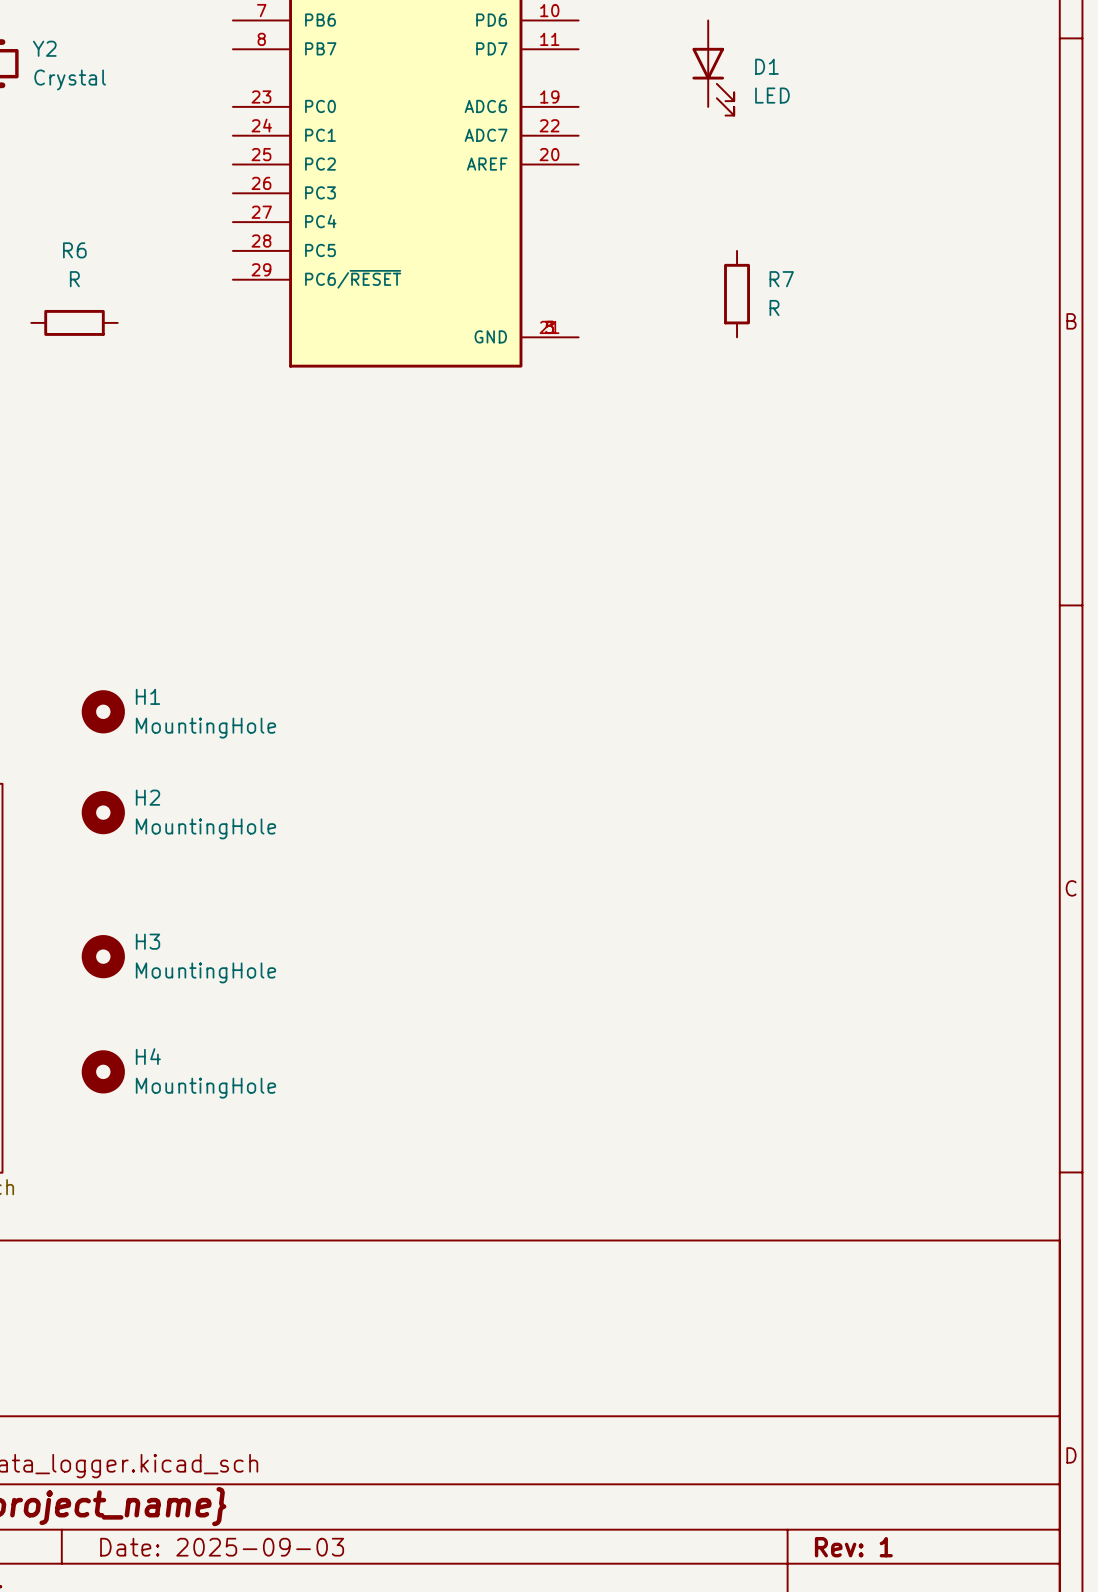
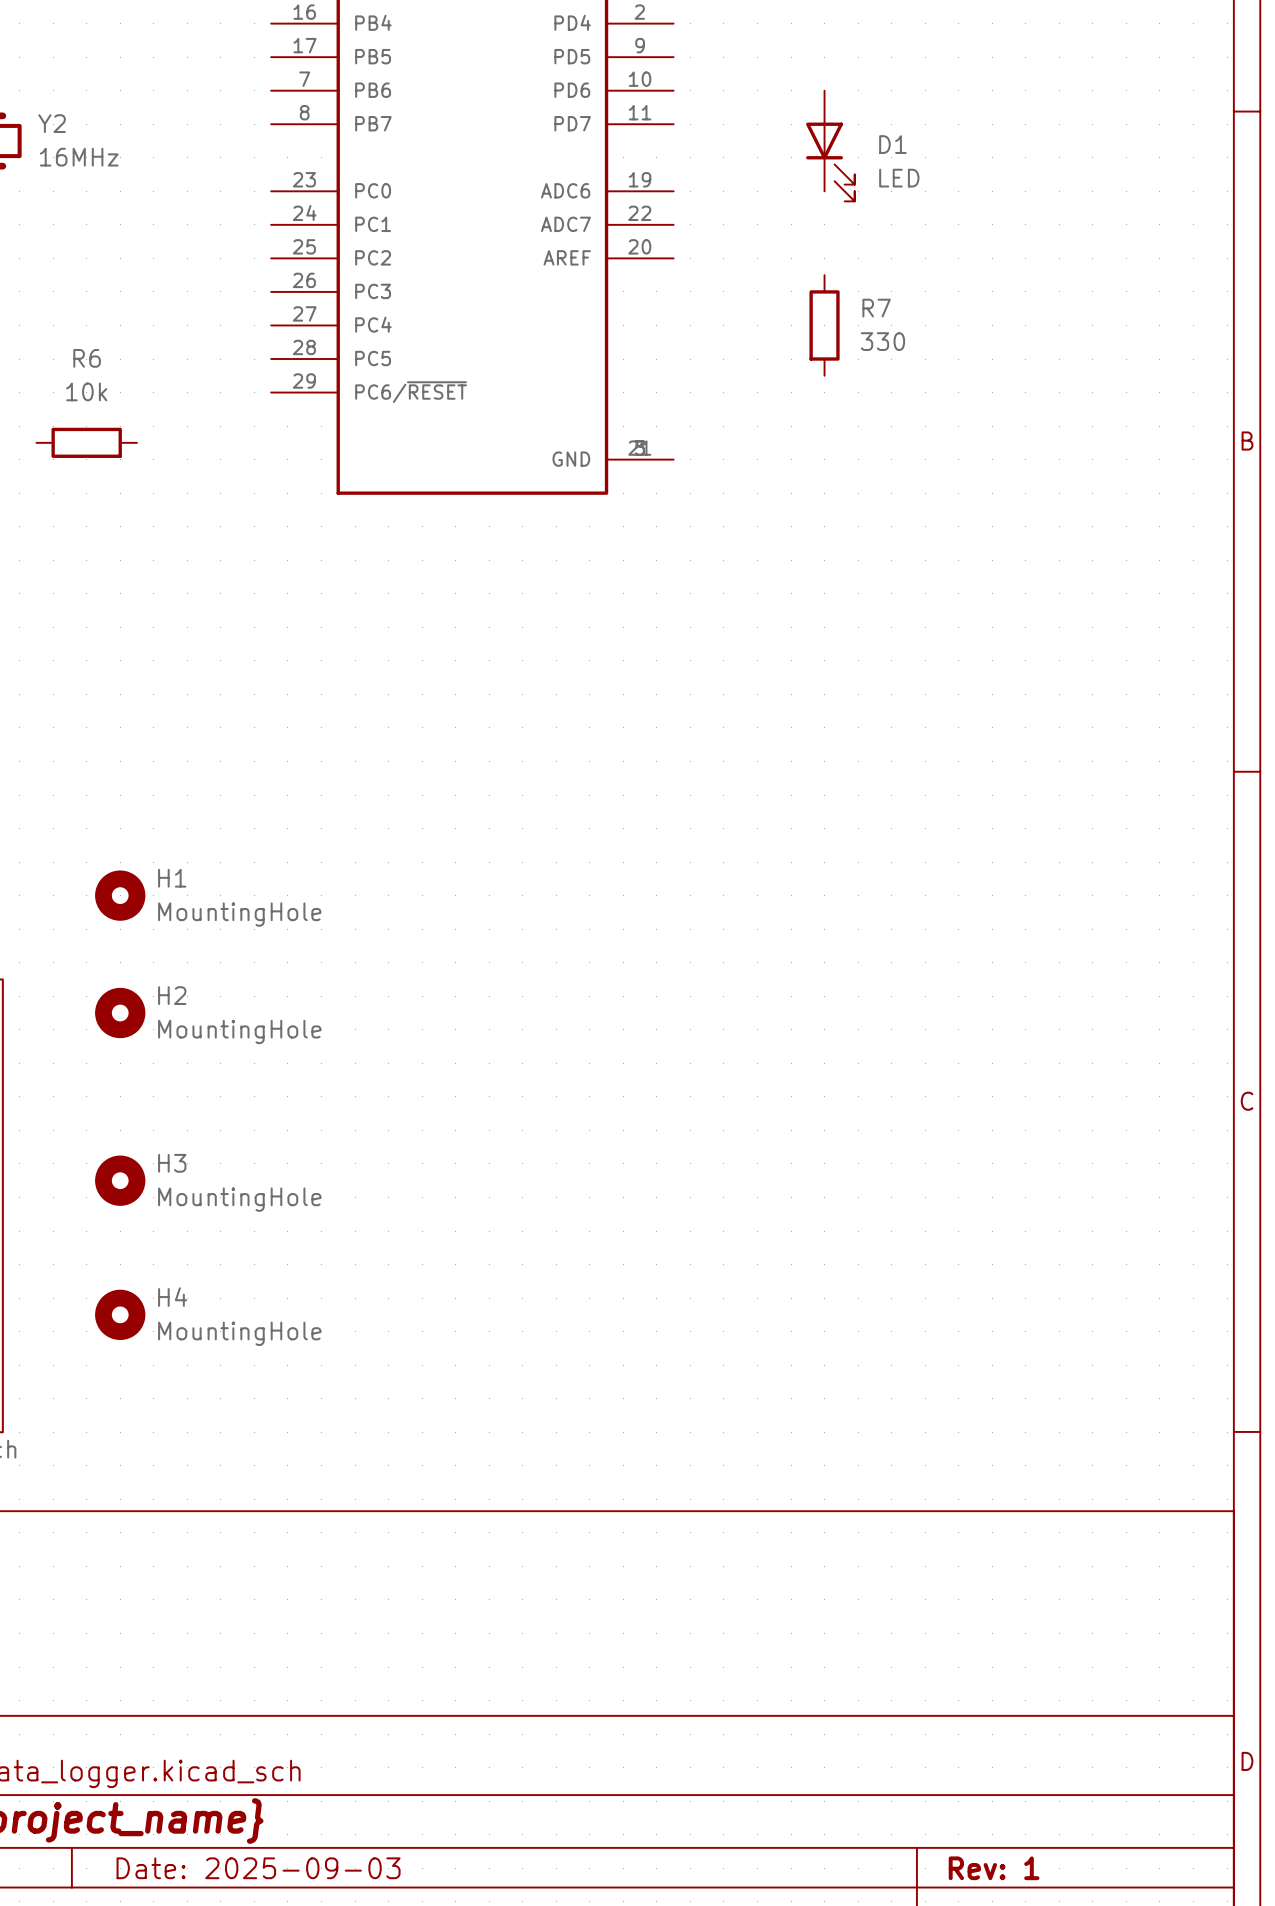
Y2 value: Crystal (70, 79) -> 16MHz (79, 157)
R6 value: R (74, 279) -> 10k (86, 391)
R7 position: (737, 294) -> (824, 325)
R7 value: R (774, 307) -> 330 (882, 341)

